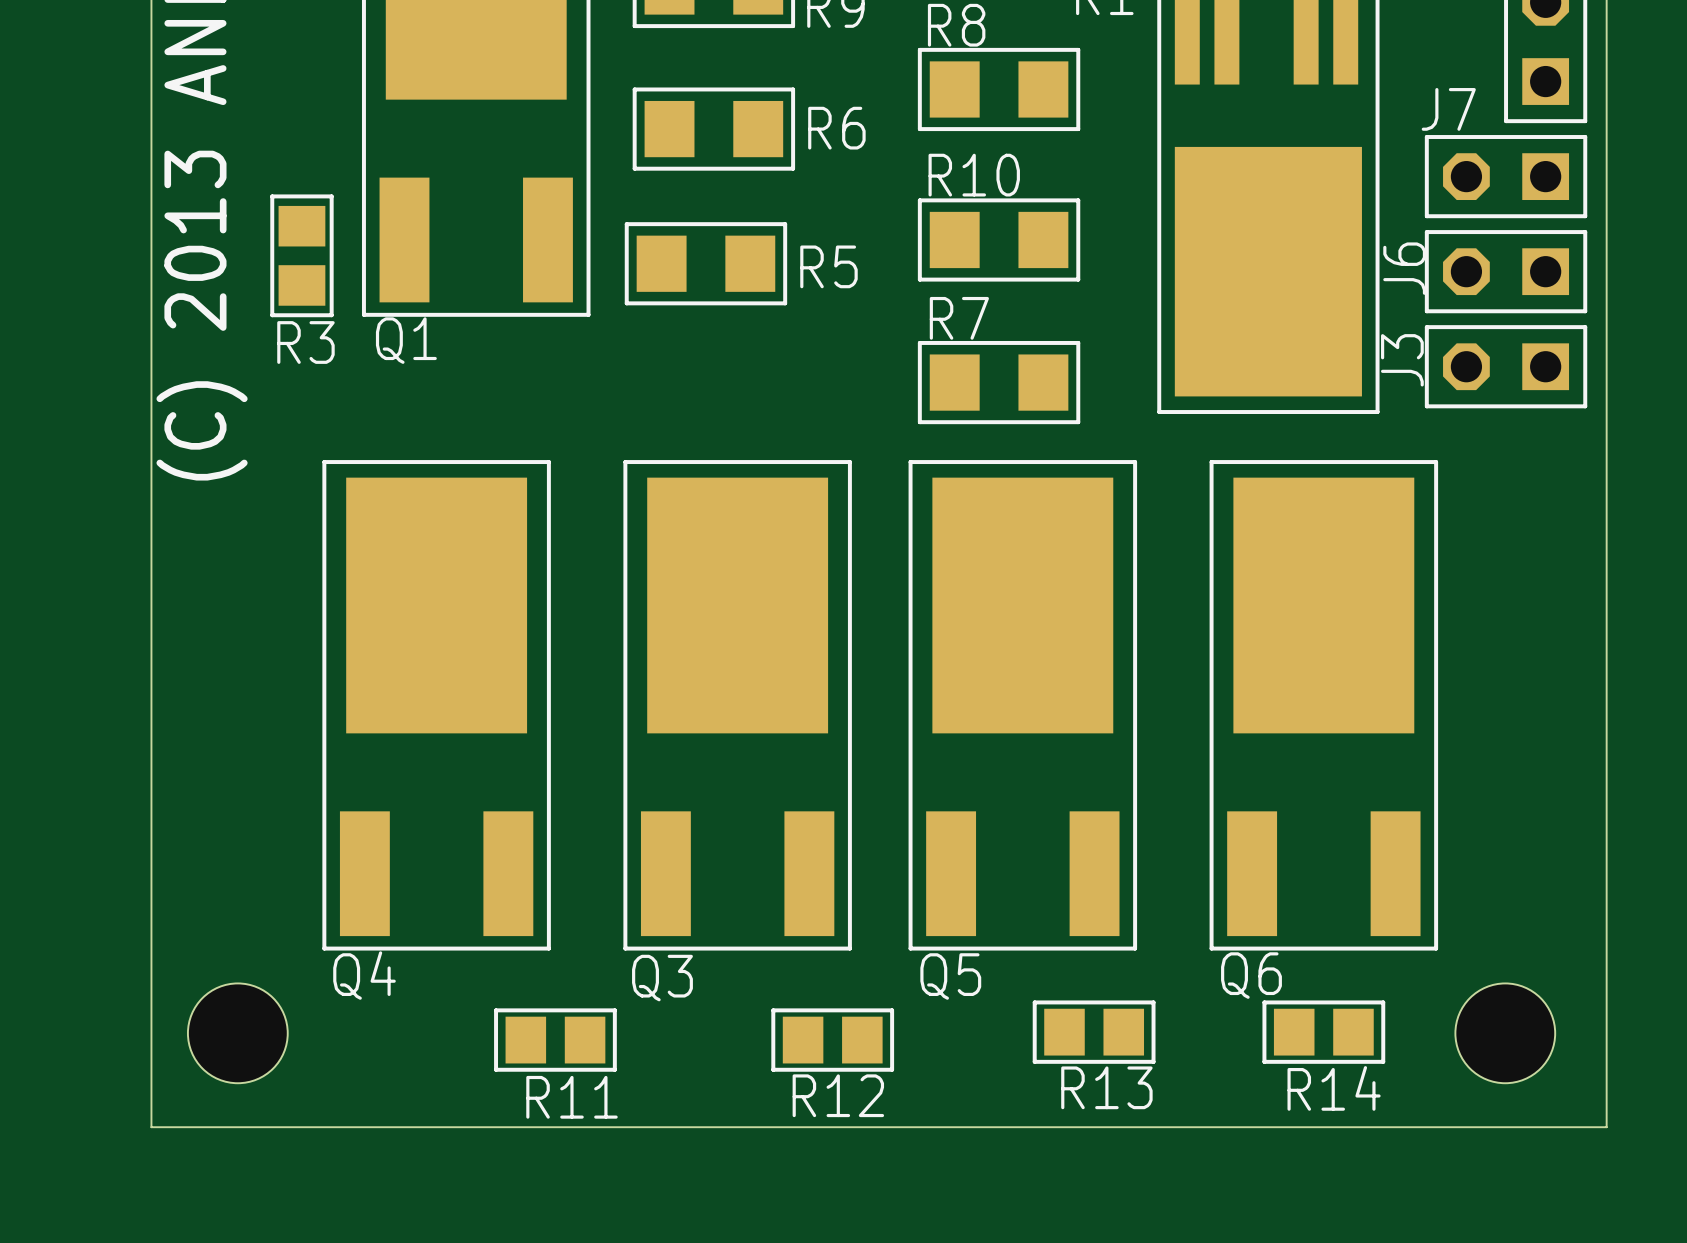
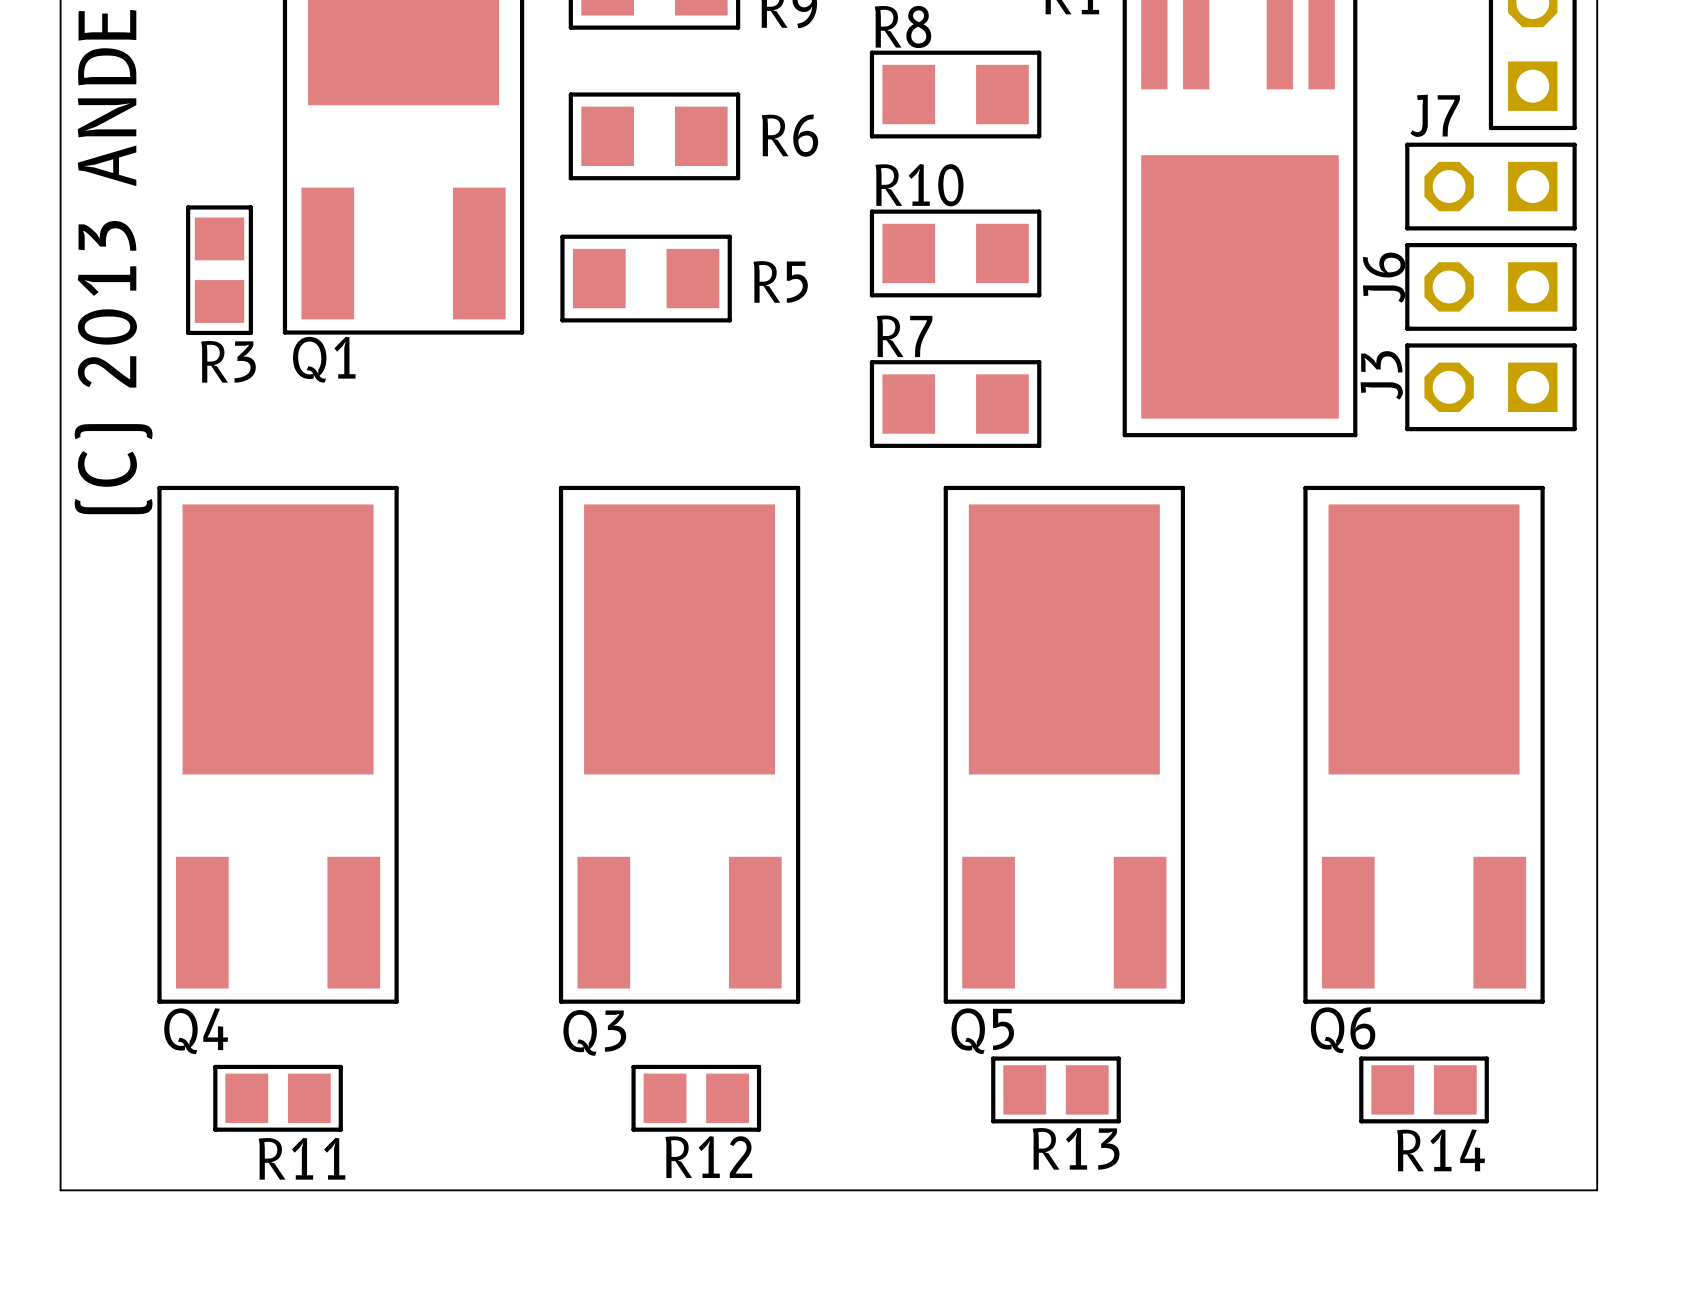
Q4 position: (436, 705) -> (278, 744)
Q5 position: (1022, 705) -> (1064, 744)
Q6 position: (1323, 705) -> (1424, 744)
R14 position: (1323, 1032) -> (1424, 1089)
hole: (237, 1033) -> none
hole: (1505, 1033) -> none
R11 position: (555, 1040) -> (278, 1098)
R12 position: (832, 1040) -> (696, 1098)

